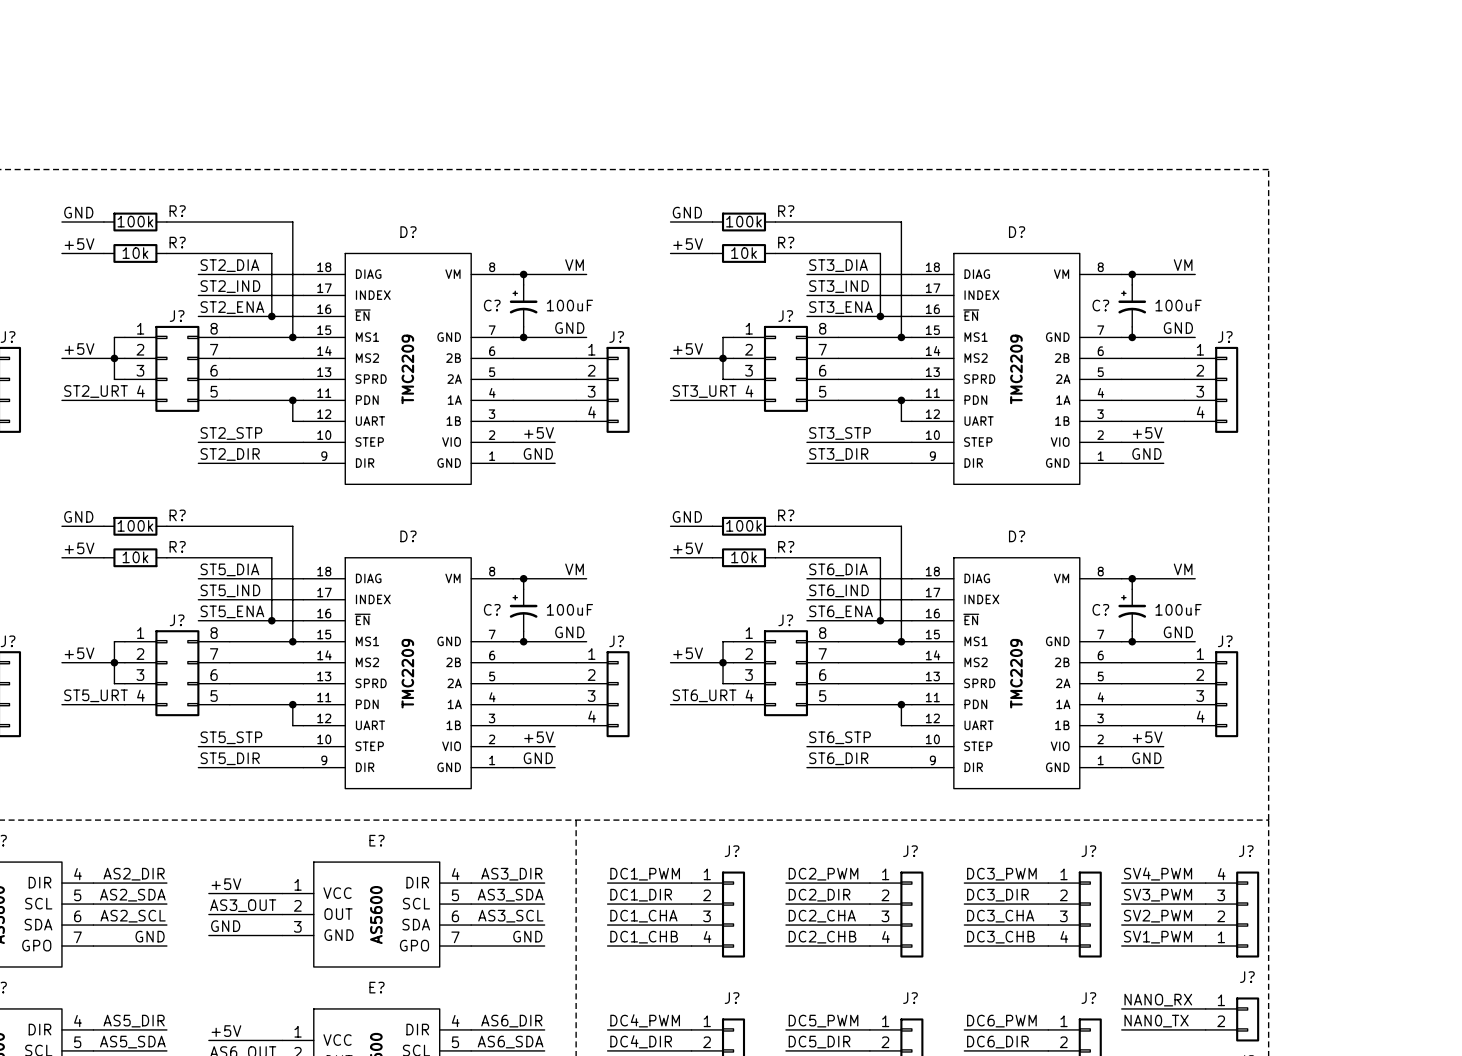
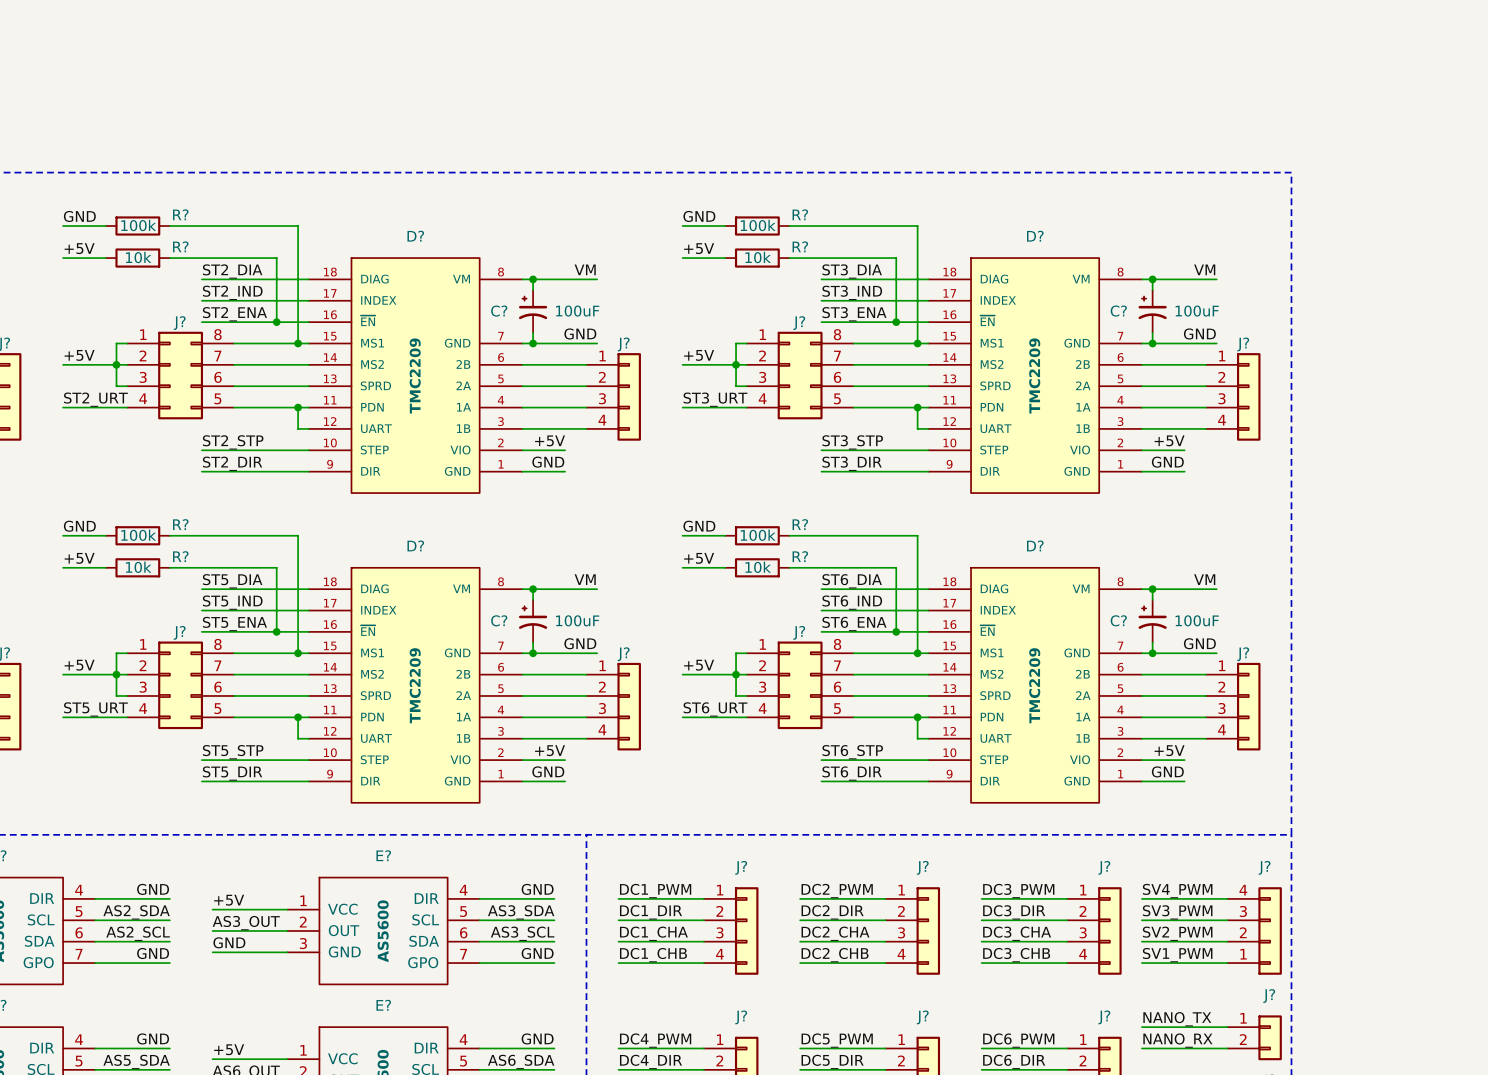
label: AS2_DIR (134, 874) -> GND (153, 889)
label: AS3_DIR (511, 874) -> GND (537, 889)
label: NANO_RX (1158, 1000) -> NANO_TX (1177, 1019)
label: AS5_DIR (134, 1021) -> GND (153, 1038)
label: AS6_DIR (511, 1021) -> GND (537, 1038)
label: NAN0_TX (1156, 1021) -> NANO_RX (1177, 1040)

